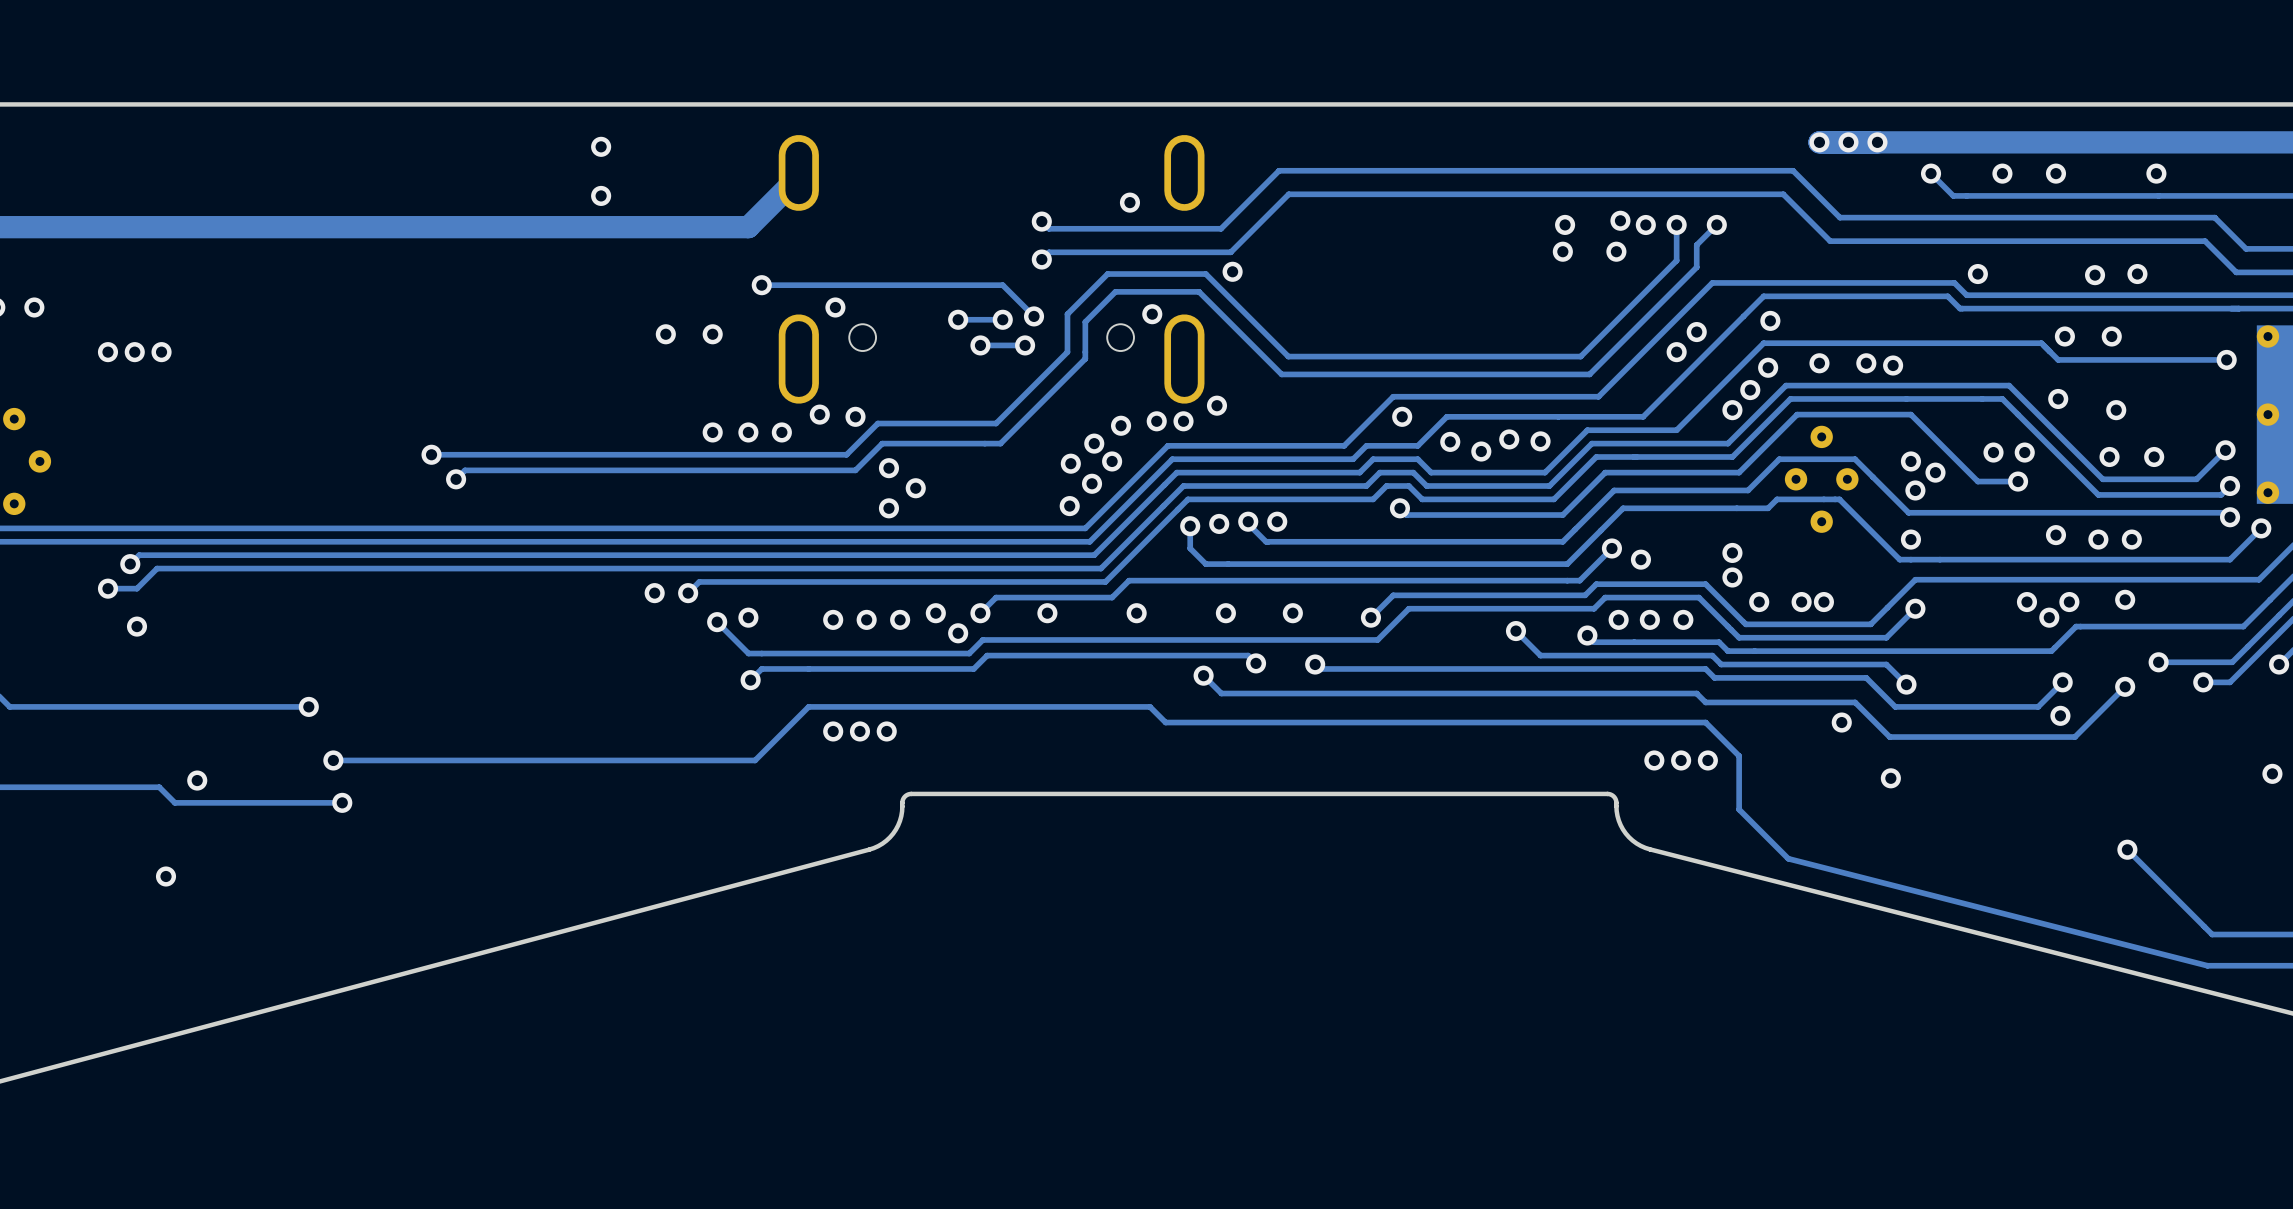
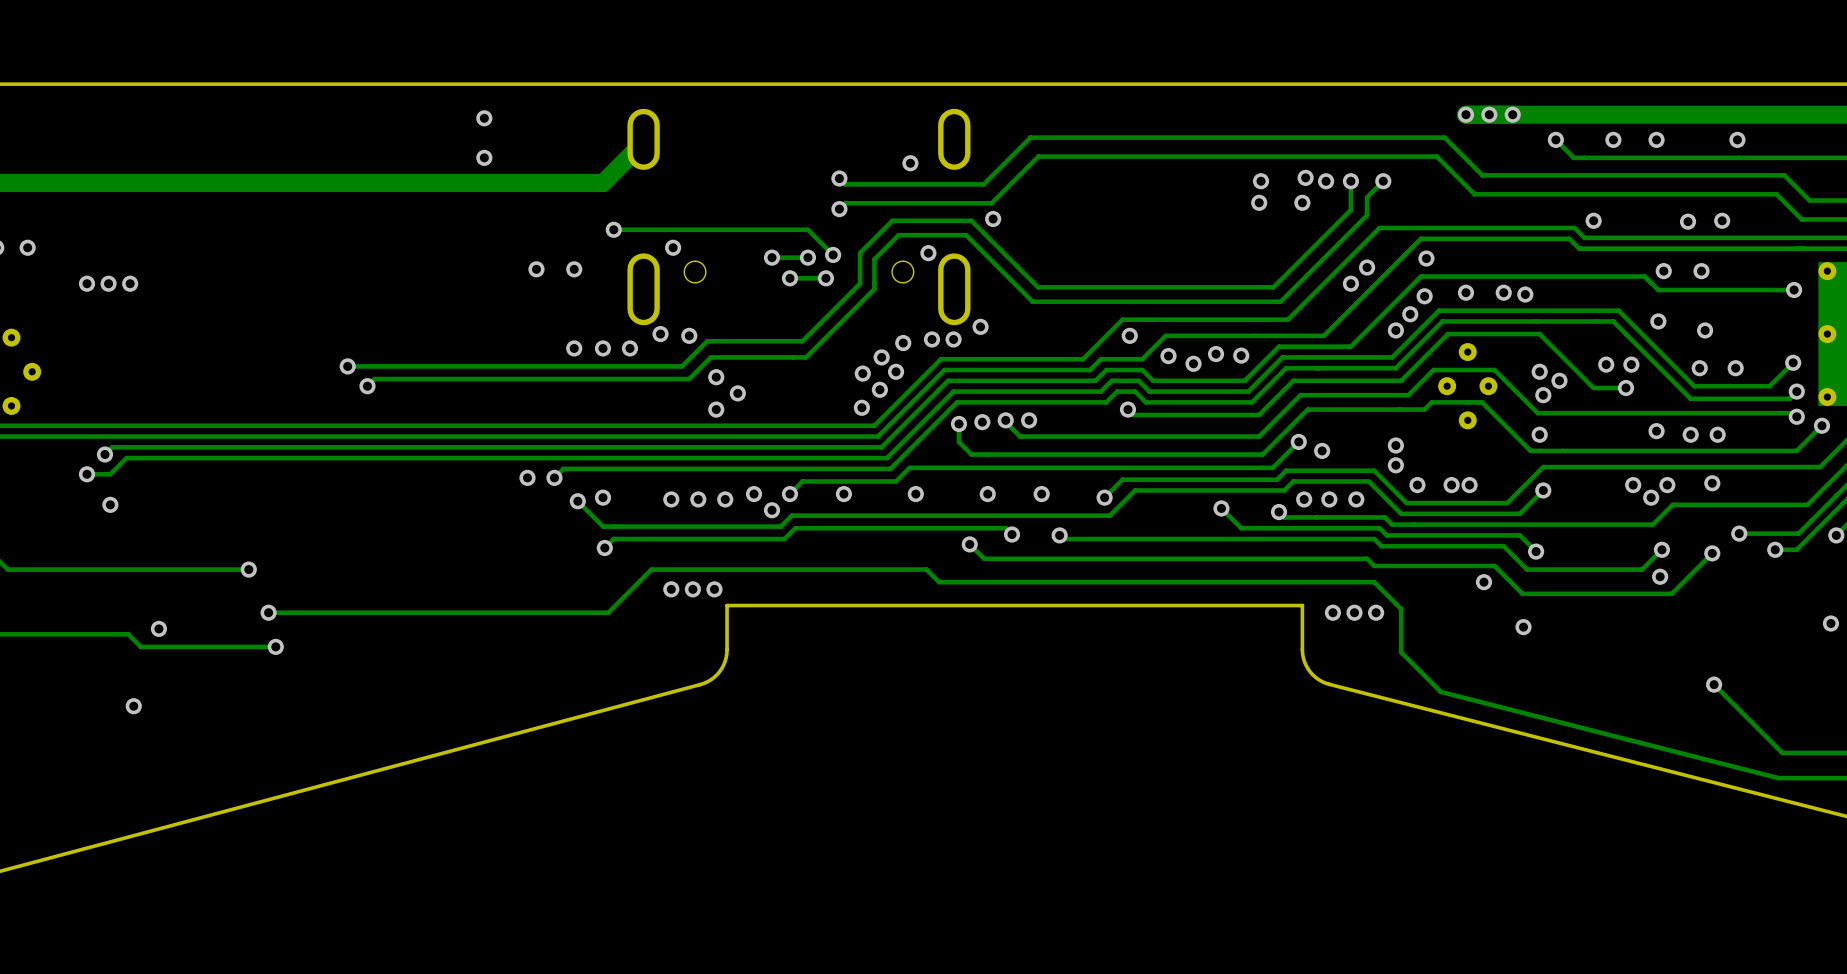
board edge: (1616, 802) (1613, 796) (1607, 793) (911, 793) (904, 796) (902, 802) -> (1302, 646) (1302, 605) (727, 605) (727, 646)

